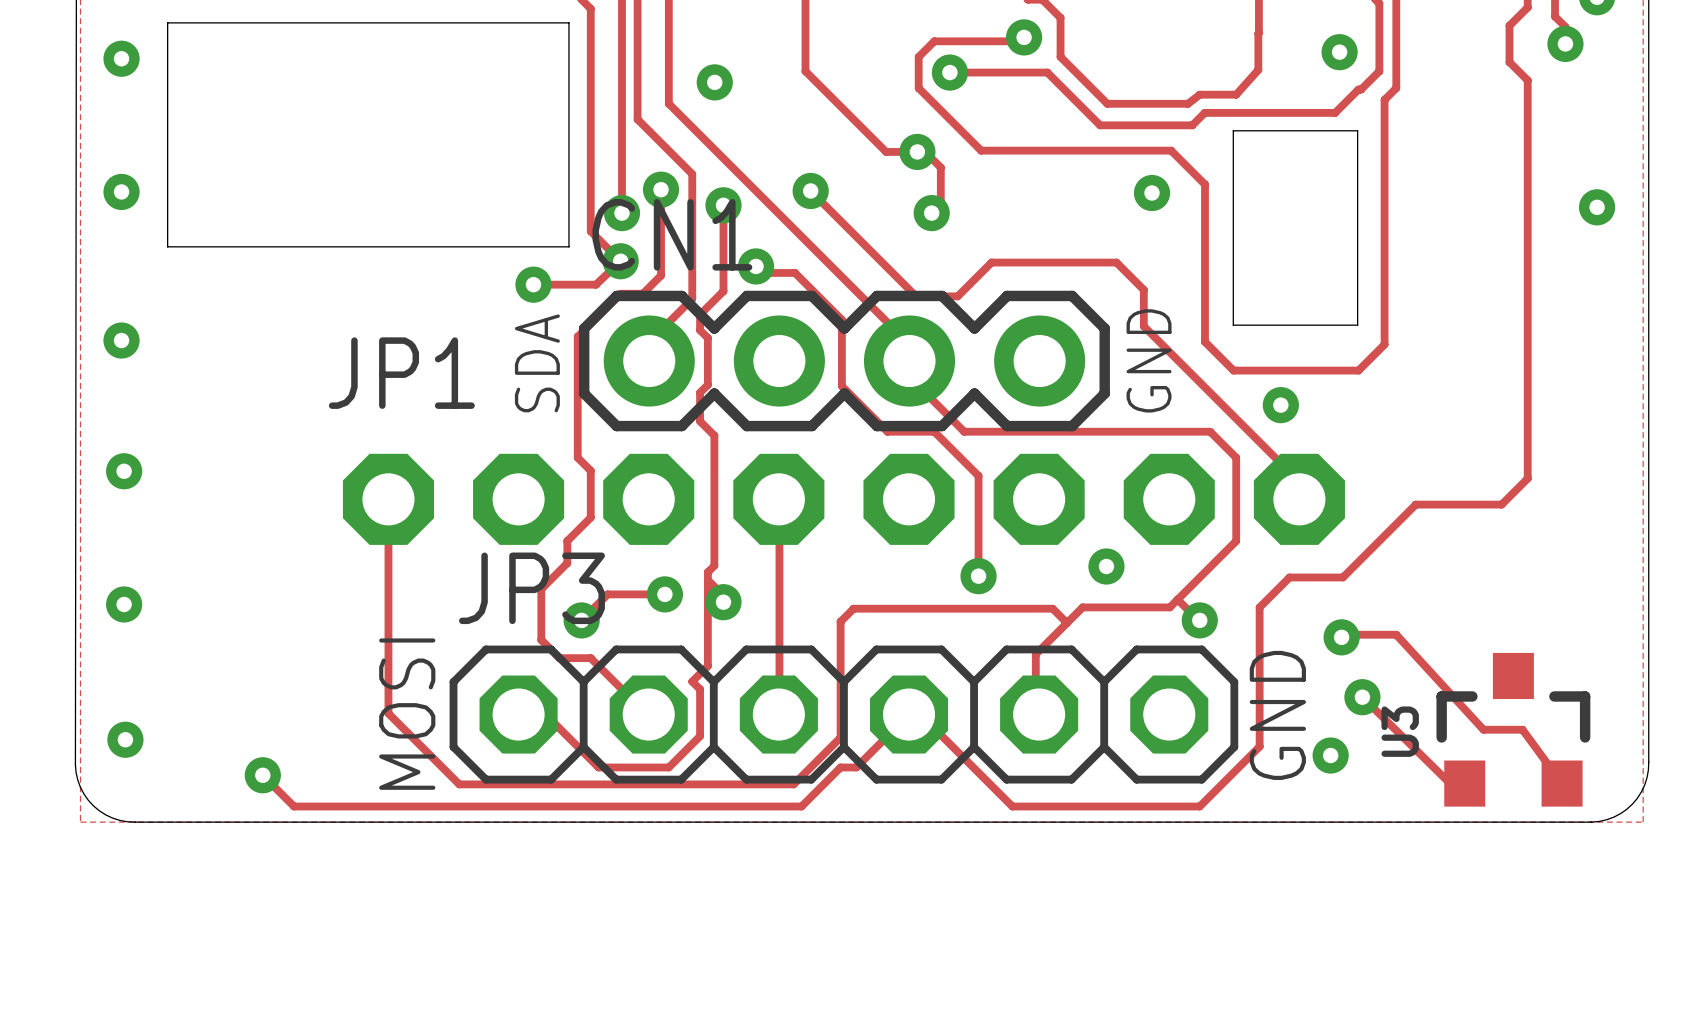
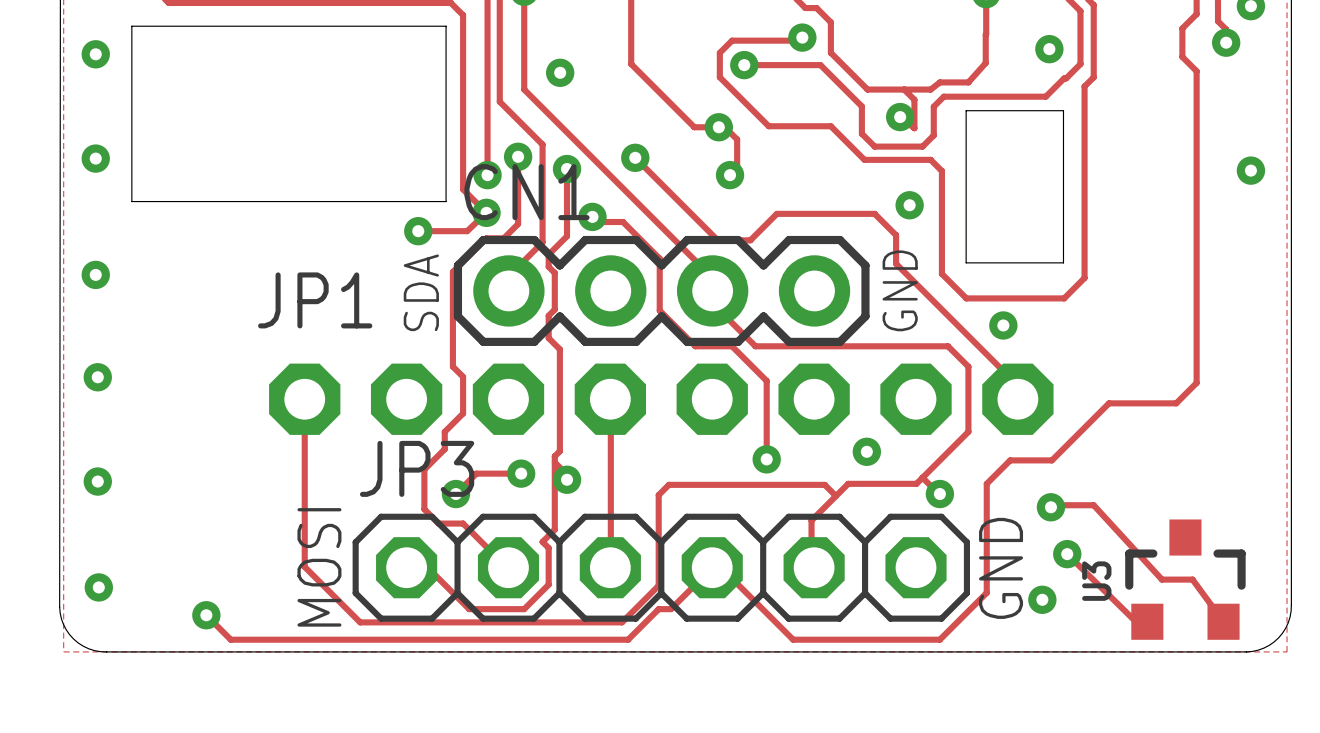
track: none -> (904, 89) (914, 99) (914, 128) (900, 117)
track: (1100, 125) (1192, 125) -> (861, 106) (861, 133) (874, 146) (922, 146) (933, 135) (933, 106)
via: none -> (900, 117)
track: (1060, 150) (1171, 150) (1204, 184) (1204, 341) -> (830, 126) (864, 159) (930, 159) (941, 171) (941, 273) (943, 276)
via: (1152, 193) -> none
via: none -> (909, 205)

